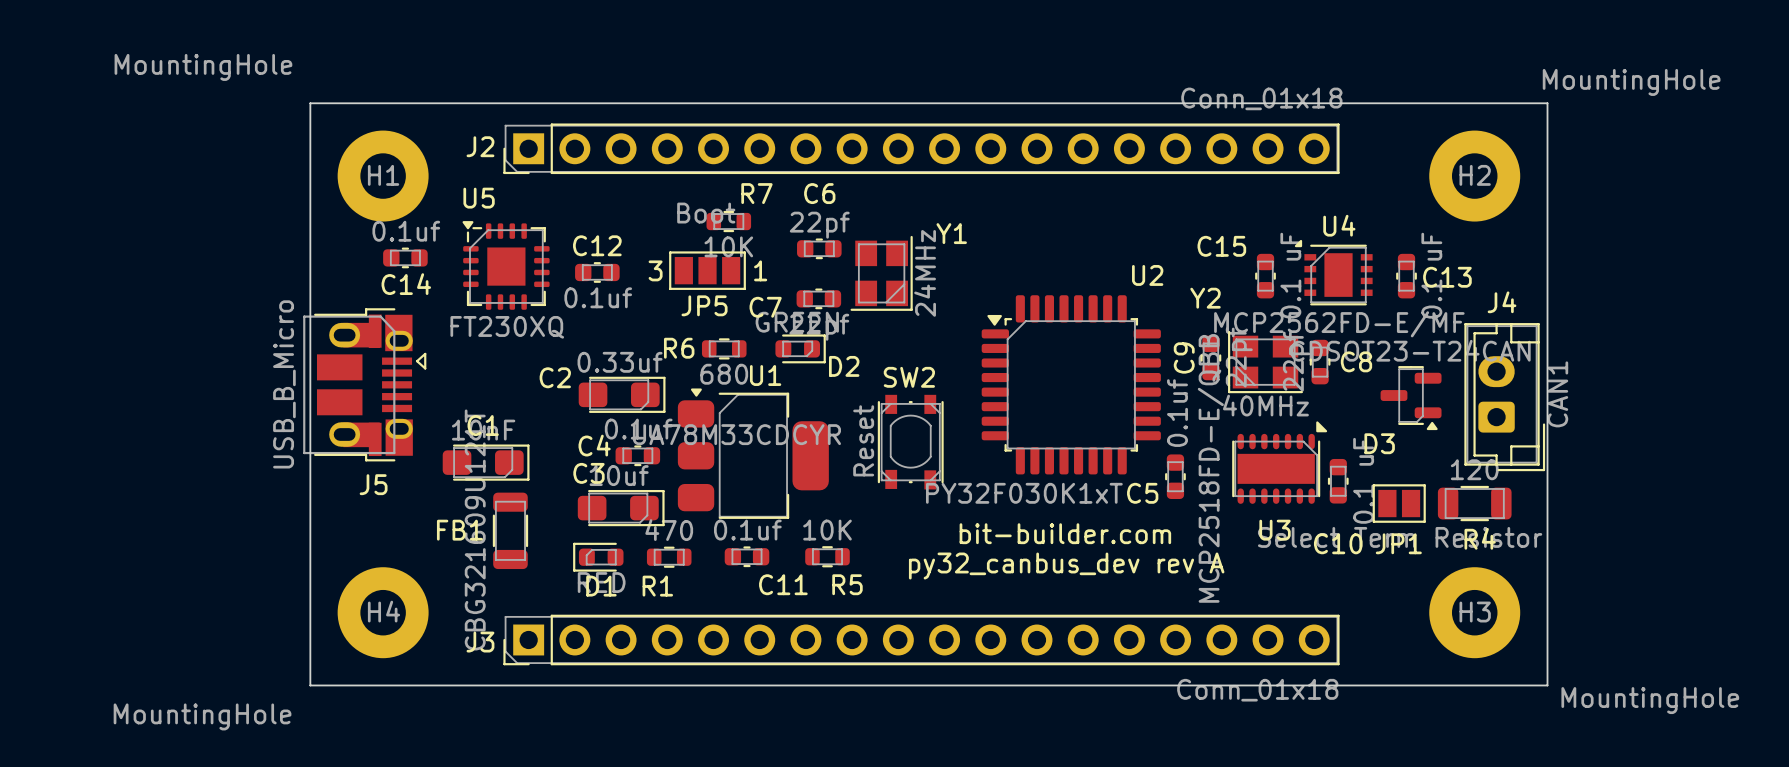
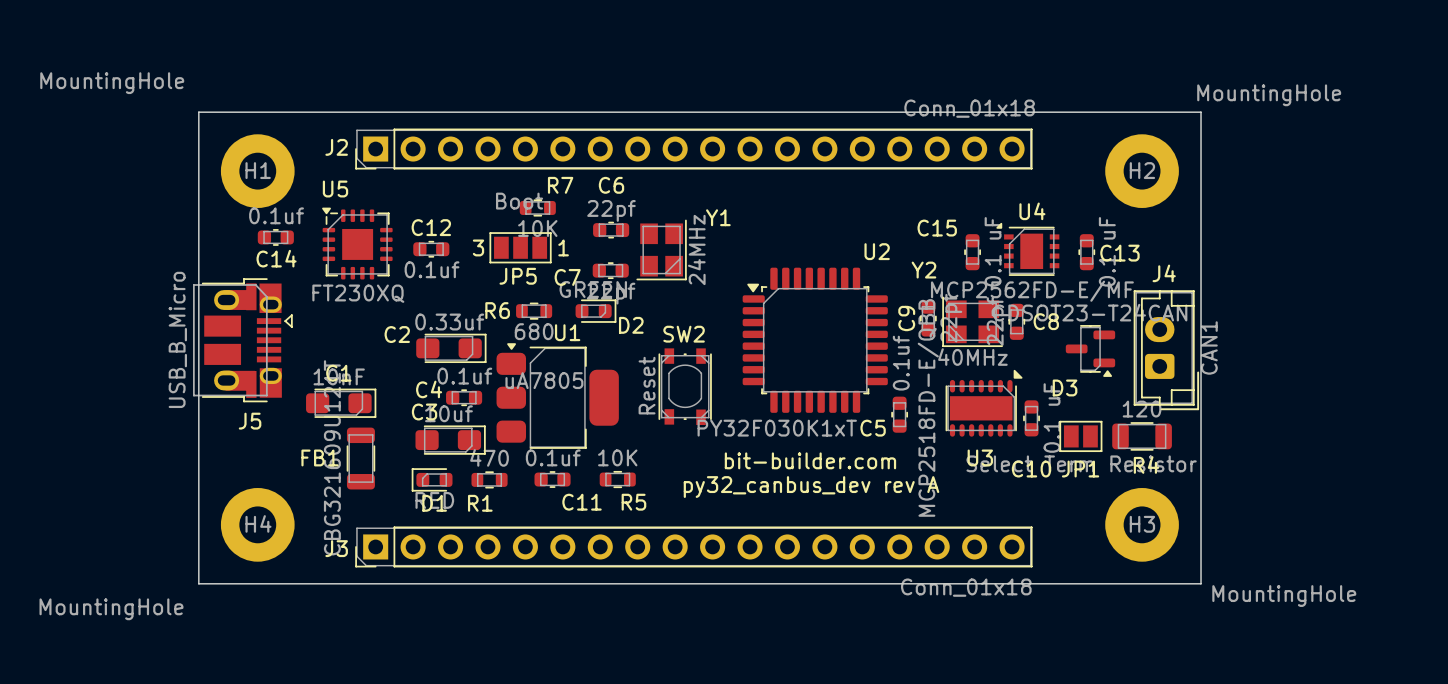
U1 value: UA78M33CDCYR (736, 434) -> uA7805 (544, 380)

